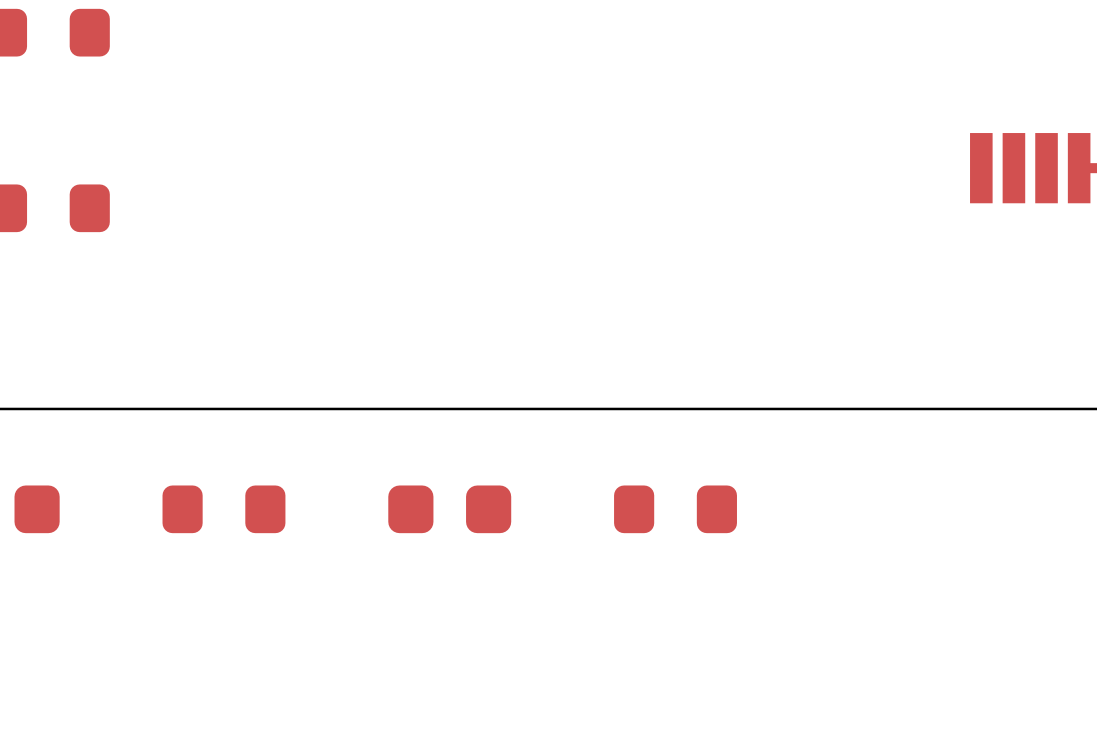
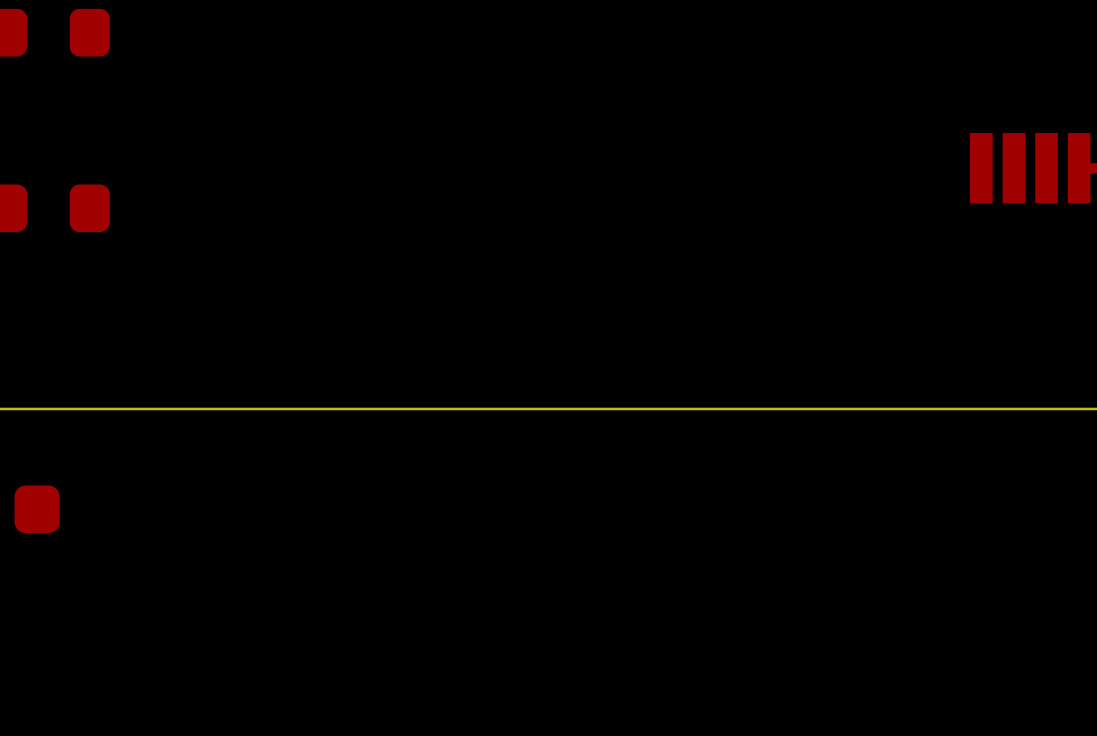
part: (223, 509) -> none
part: (449, 509) -> none
part: (675, 509) -> none

